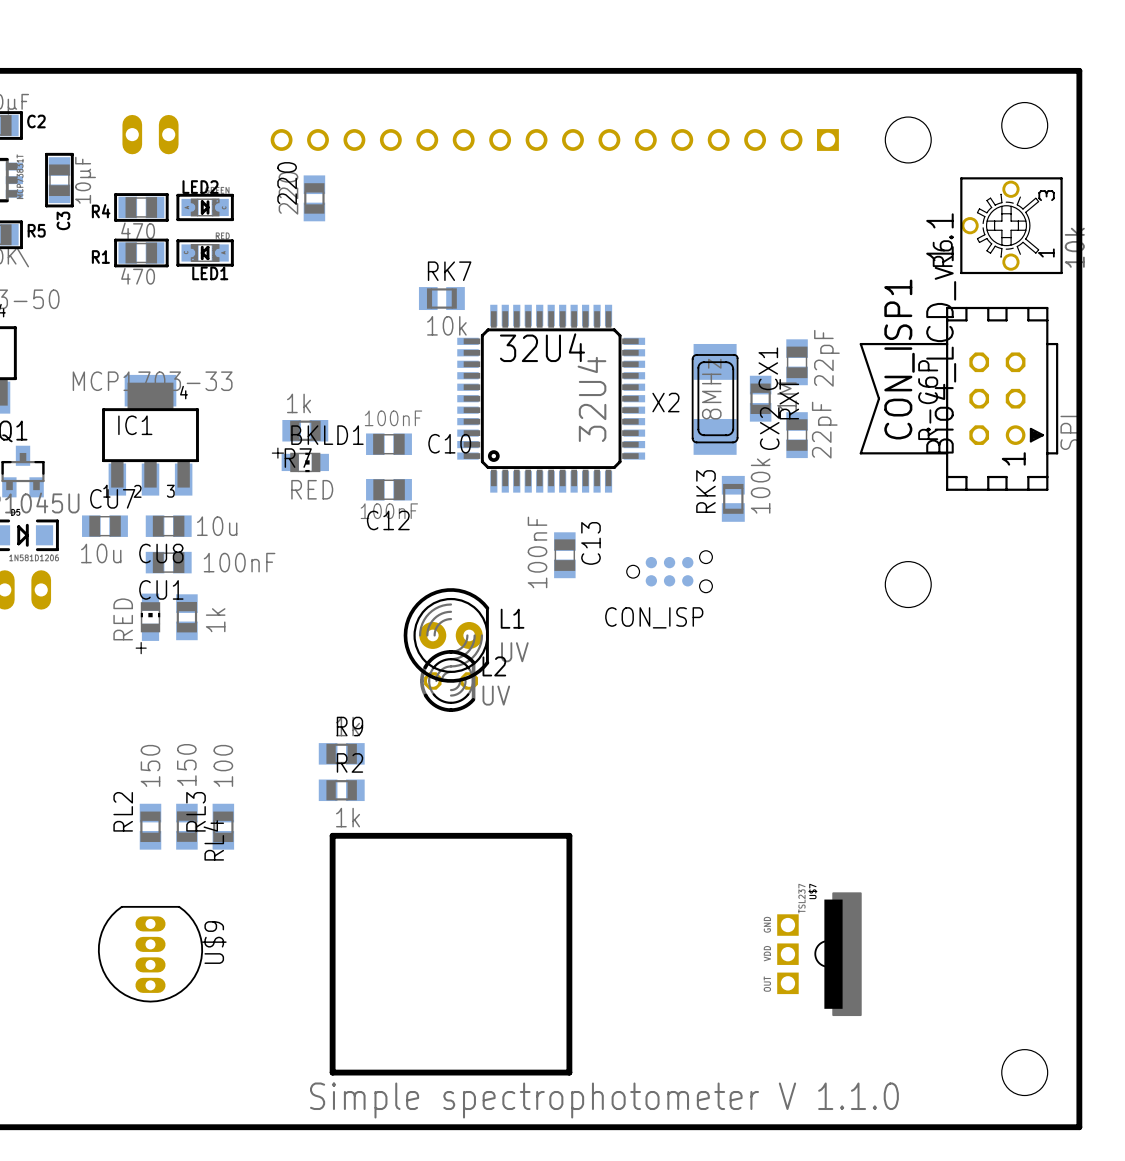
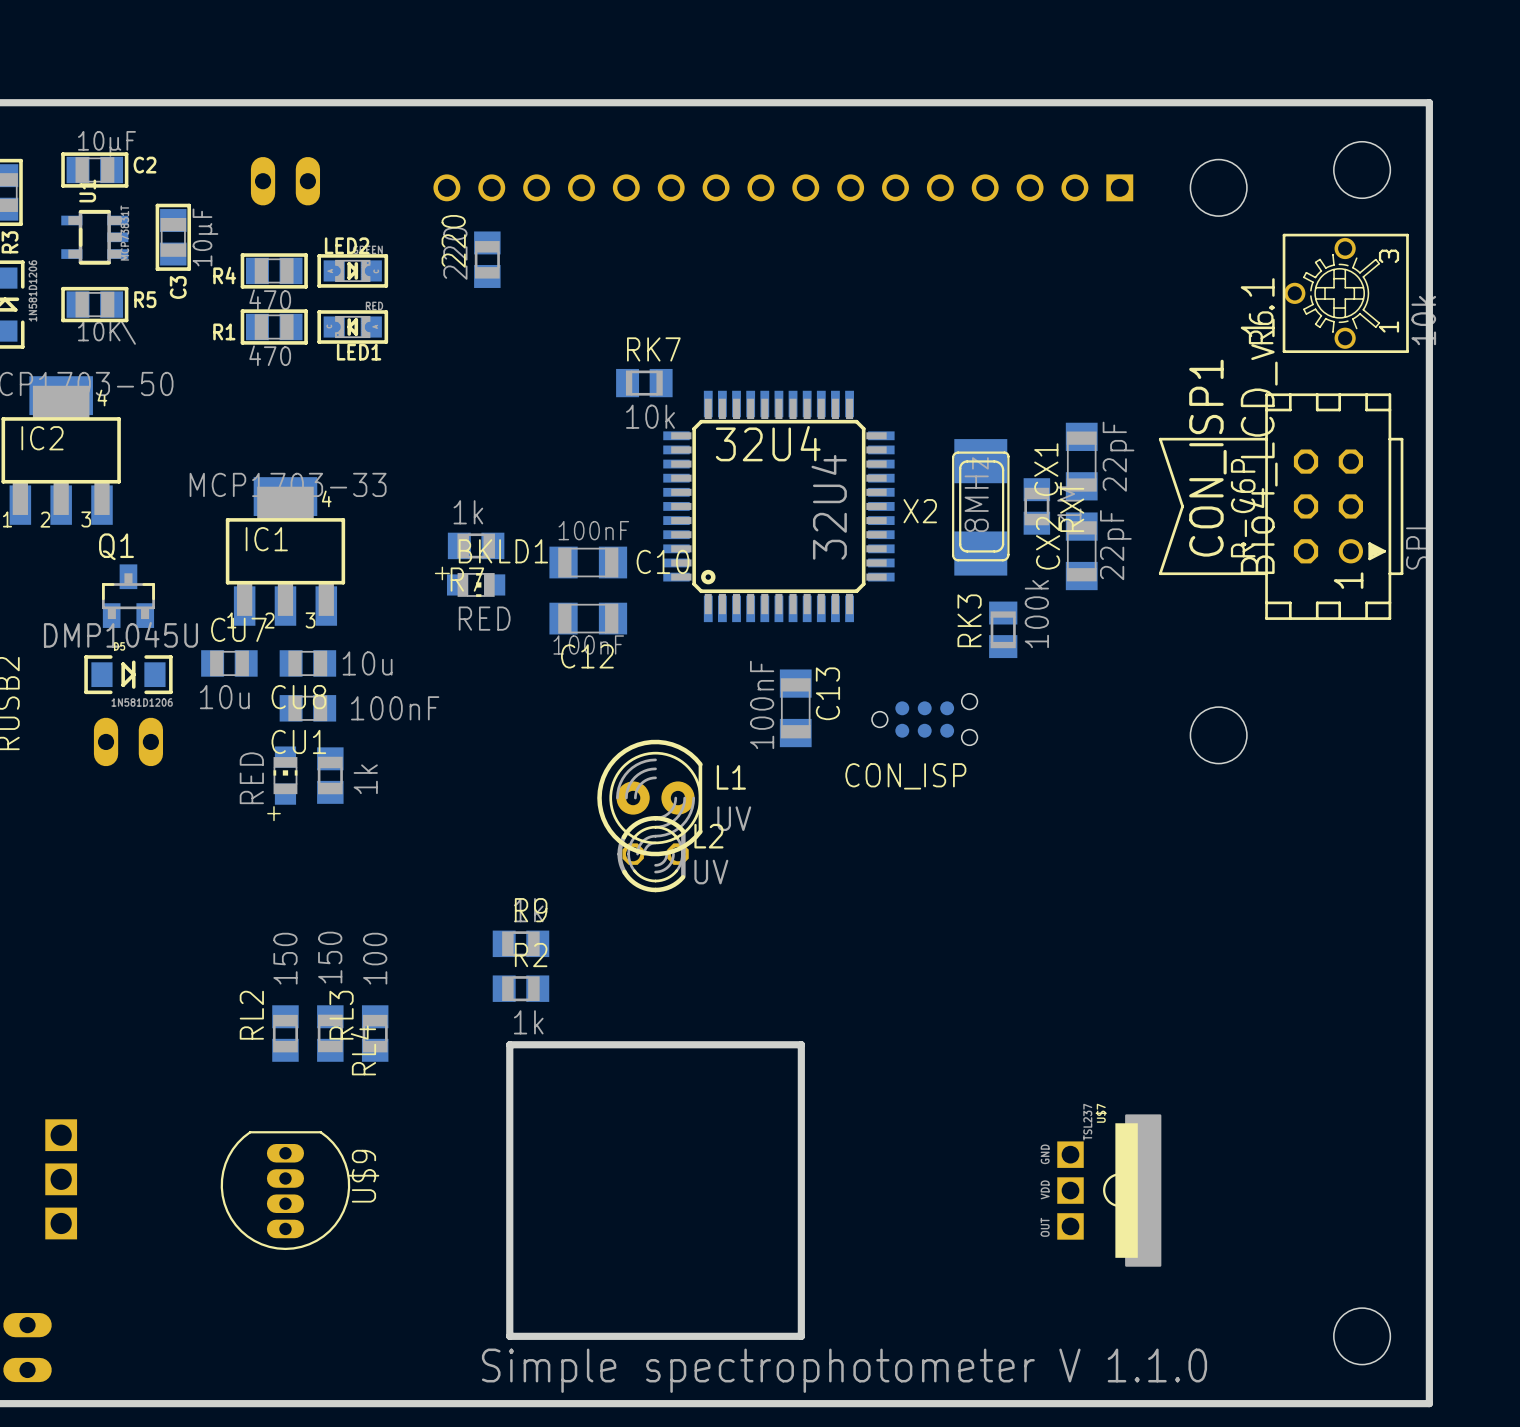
CX1 footprint: [786, 339, 808, 386] -> [1065, 422, 1098, 501]
CX2 footprint: [786, 412, 808, 459] -> [1065, 512, 1098, 591]
C10 footprint: [366, 433, 412, 455] -> [549, 546, 628, 579]
C12 footprint: [366, 479, 412, 501] -> [549, 602, 628, 635]
C13 footprint: [554, 532, 576, 579] -> [779, 669, 812, 748]

